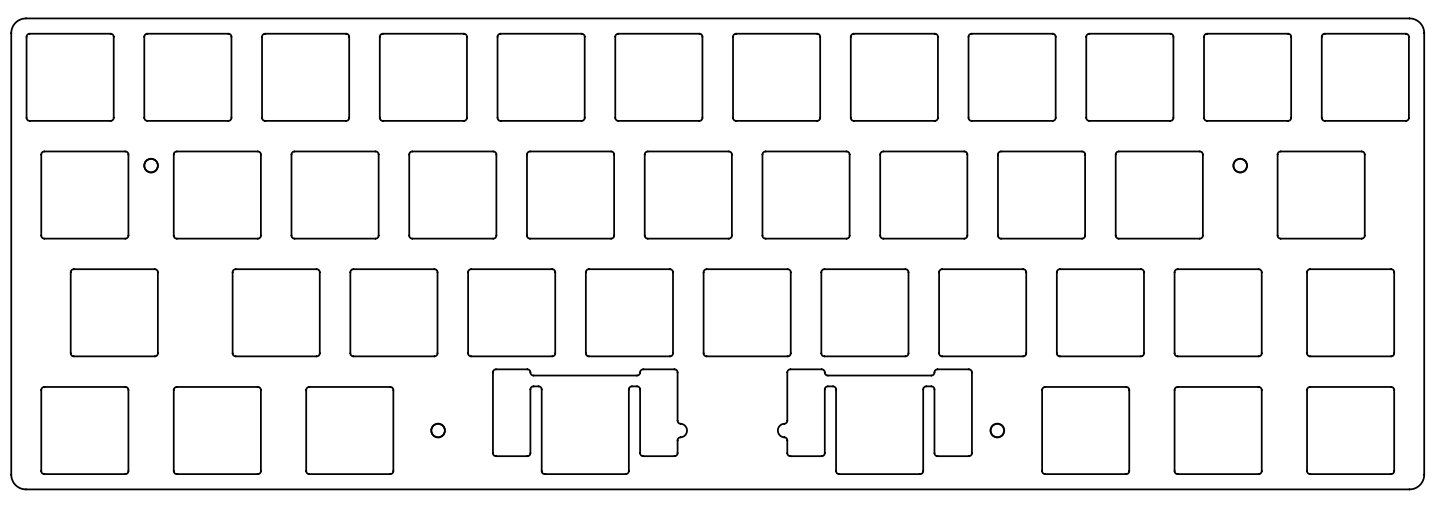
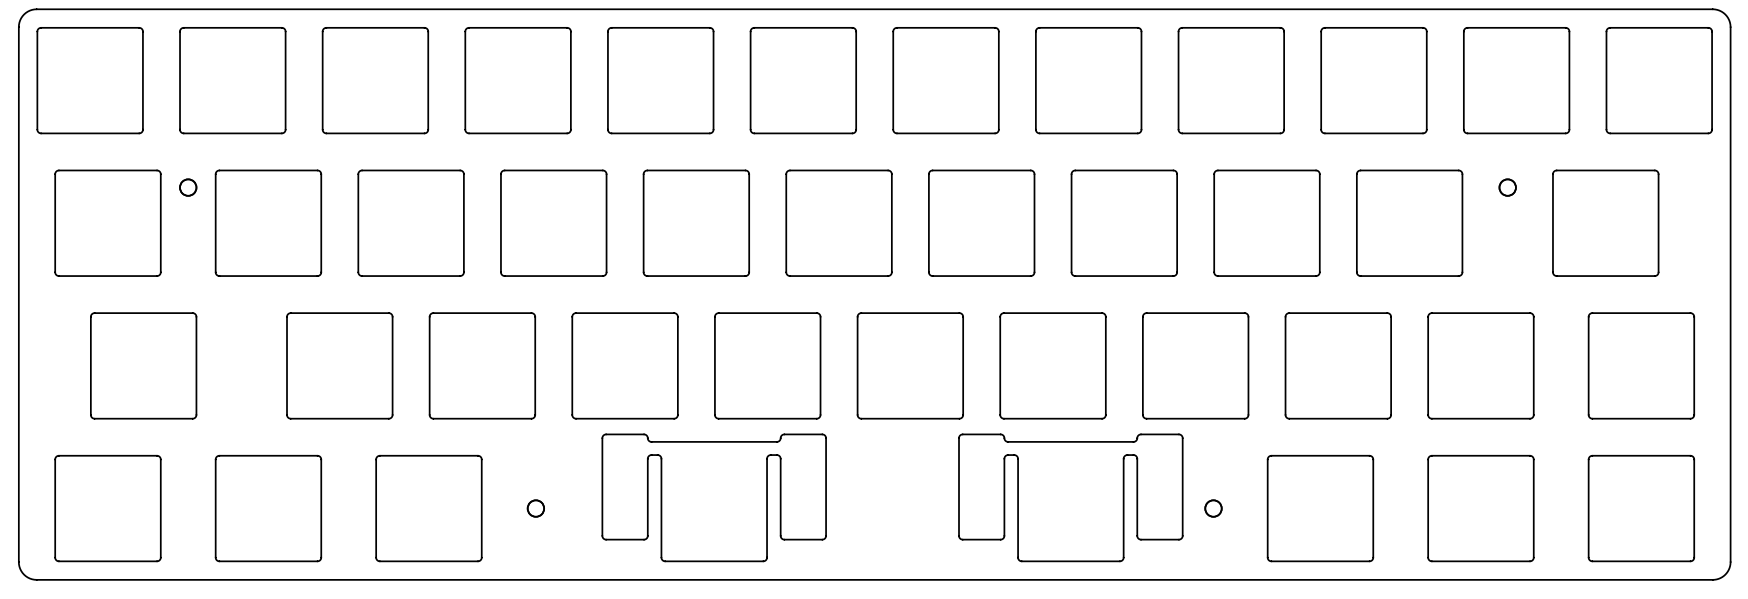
drawing: none -> [602, 434, 827, 562]
board edge: (496, 369) (527, 369) (533, 375) (637, 375) (642, 369) (675, 369) (677, 372) (677, 421) (685, 426) (686, 433) (677, 439) (675, 455) (641, 455) (640, 389) (637, 386) (631, 386) (628, 389) (627, 473) (543, 474) (541, 471) (541, 389) (539, 386) (532, 386) (530, 389) (529, 454) (496, 456) (493, 454) (492, 372) (496, 369) -> none
drawing: none -> [958, 434, 1183, 562]
board edge: (790, 369) (822, 369) (827, 375) (931, 375) (937, 369) (970, 369) (971, 372) (971, 454) (968, 456) (935, 454) (934, 389) (932, 386) (925, 386) (923, 389) (922, 473) (837, 473) (836, 471) (836, 389) (833, 386) (827, 386) (824, 389) (824, 454) (789, 455) (787, 439) (779, 435) (777, 430) (779, 425) (787, 421) (787, 372) (790, 369) -> none

